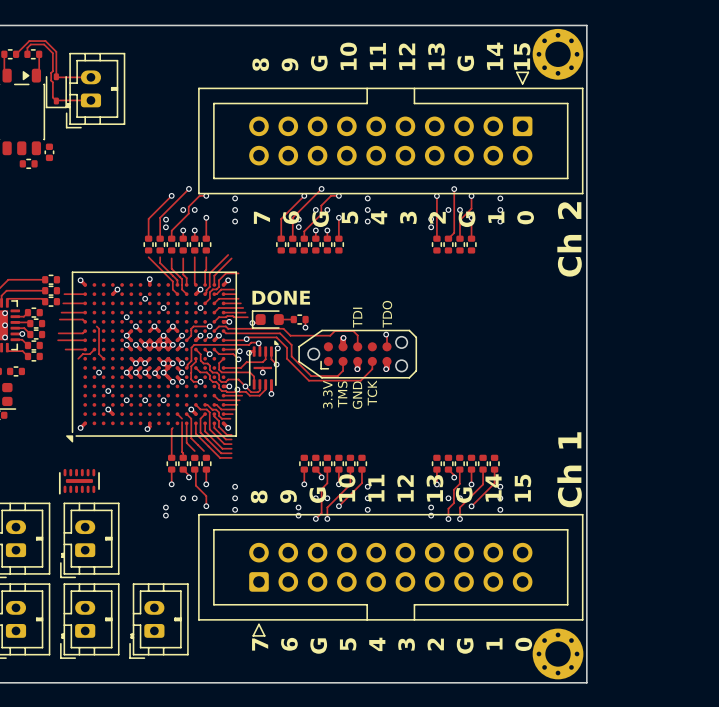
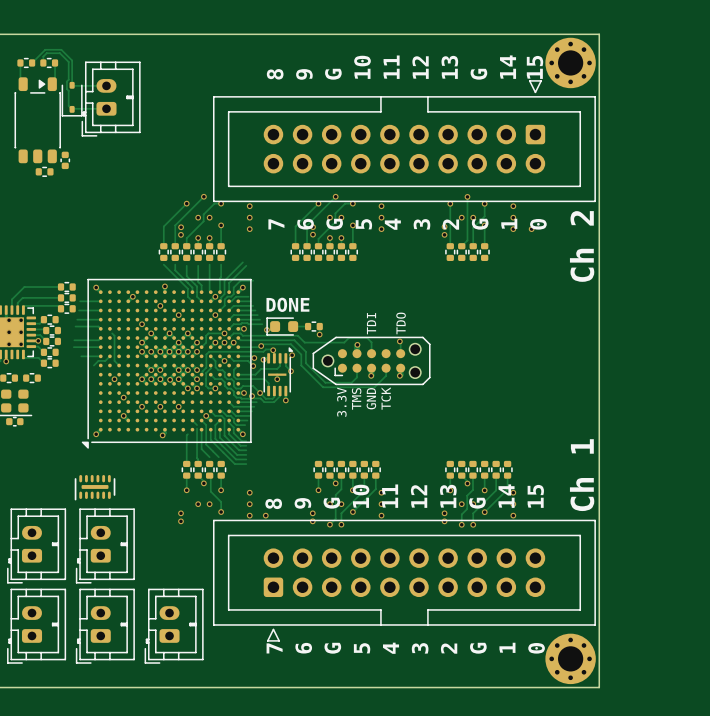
via: none -> (531, 229)
via: none -> (265, 515)

